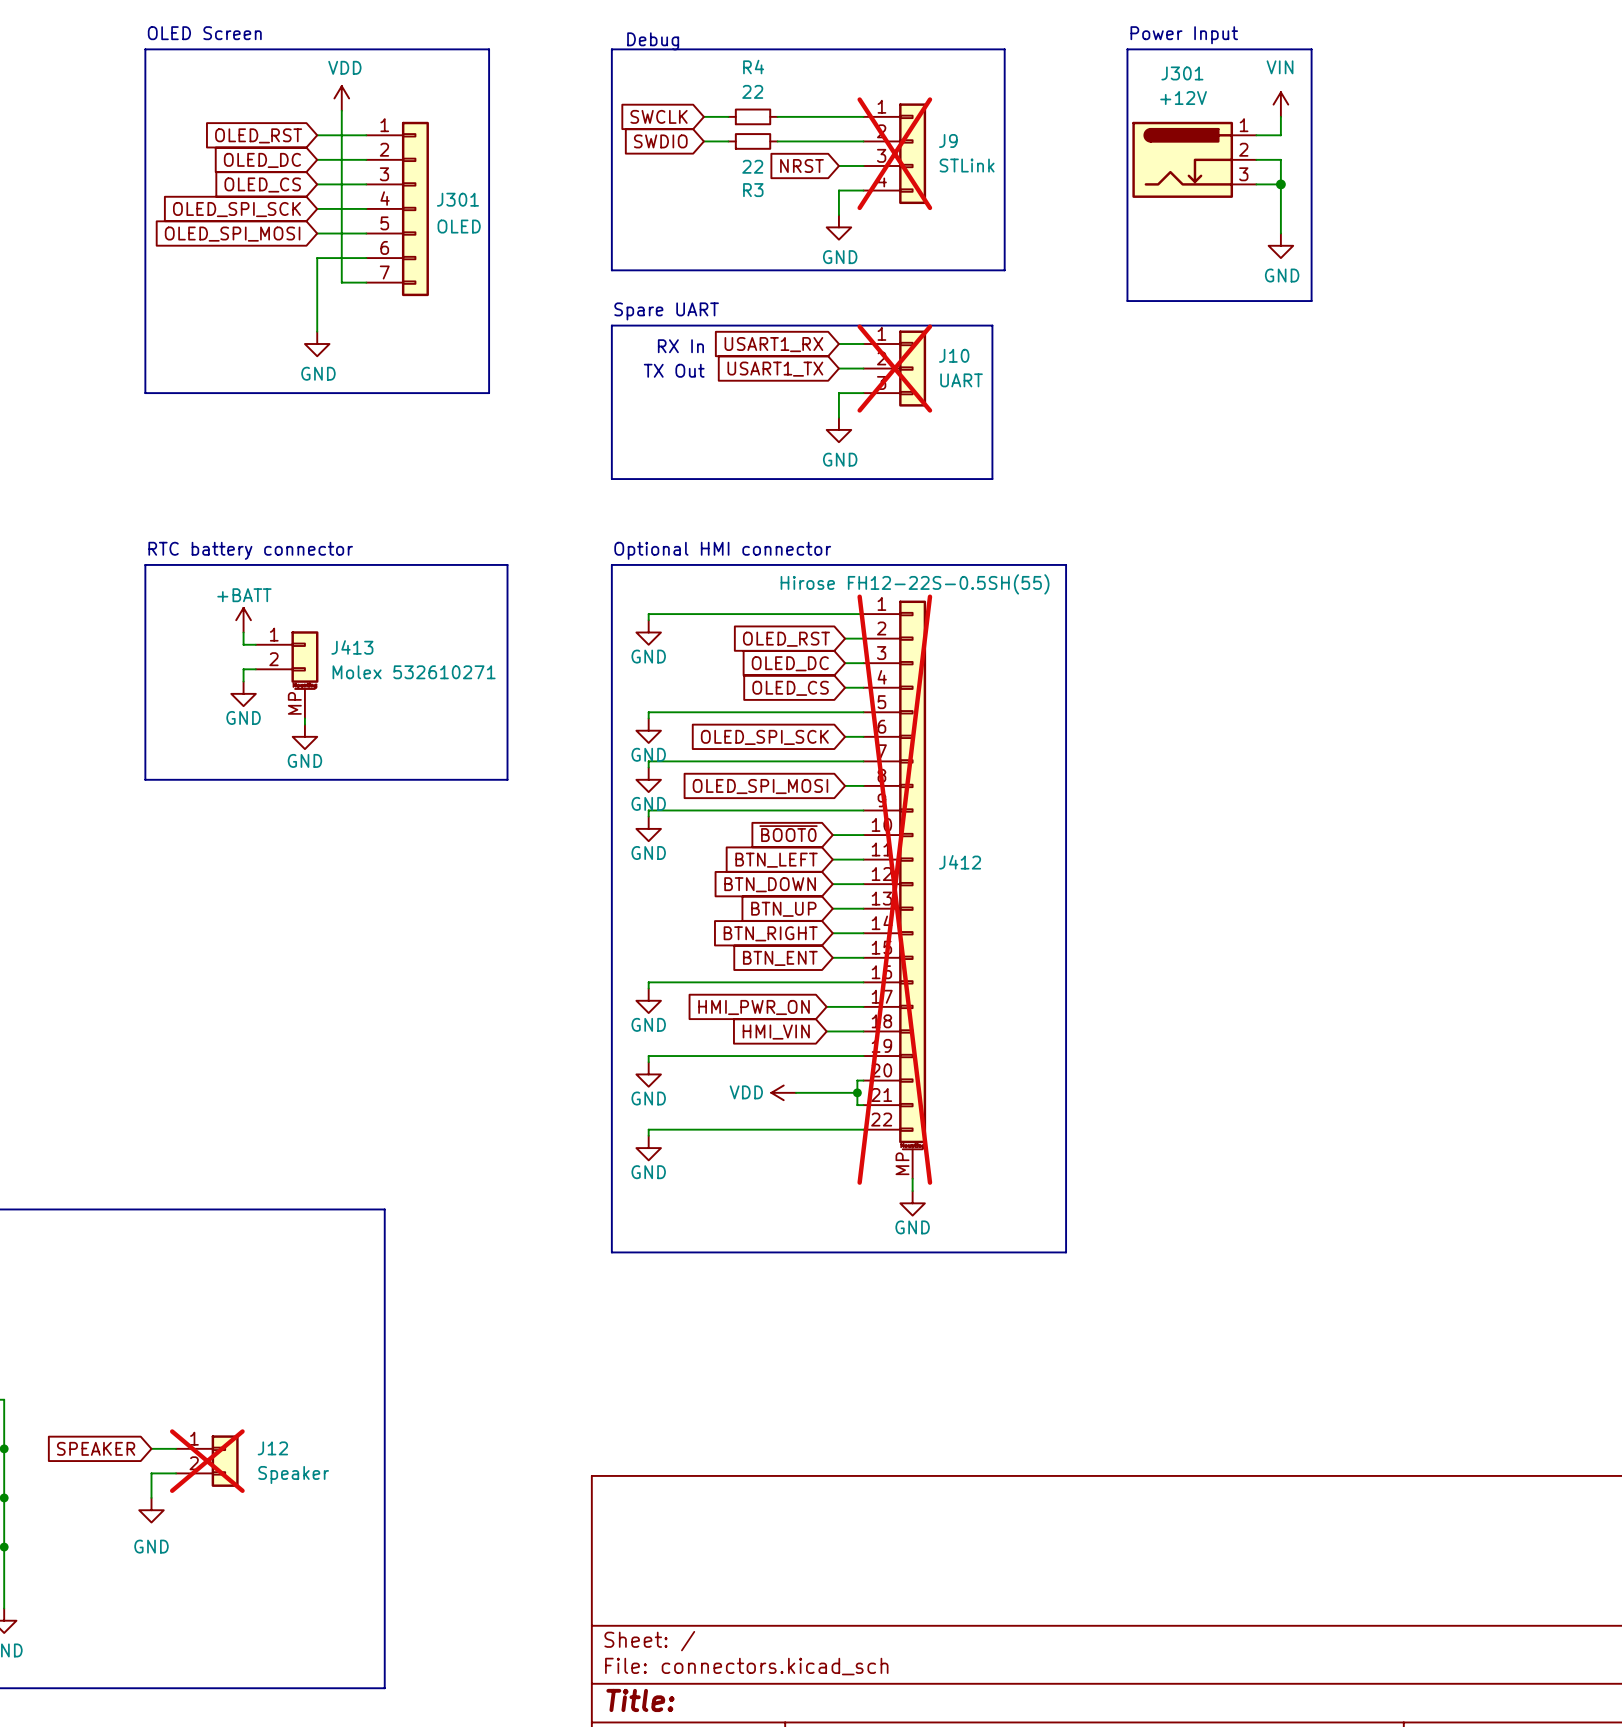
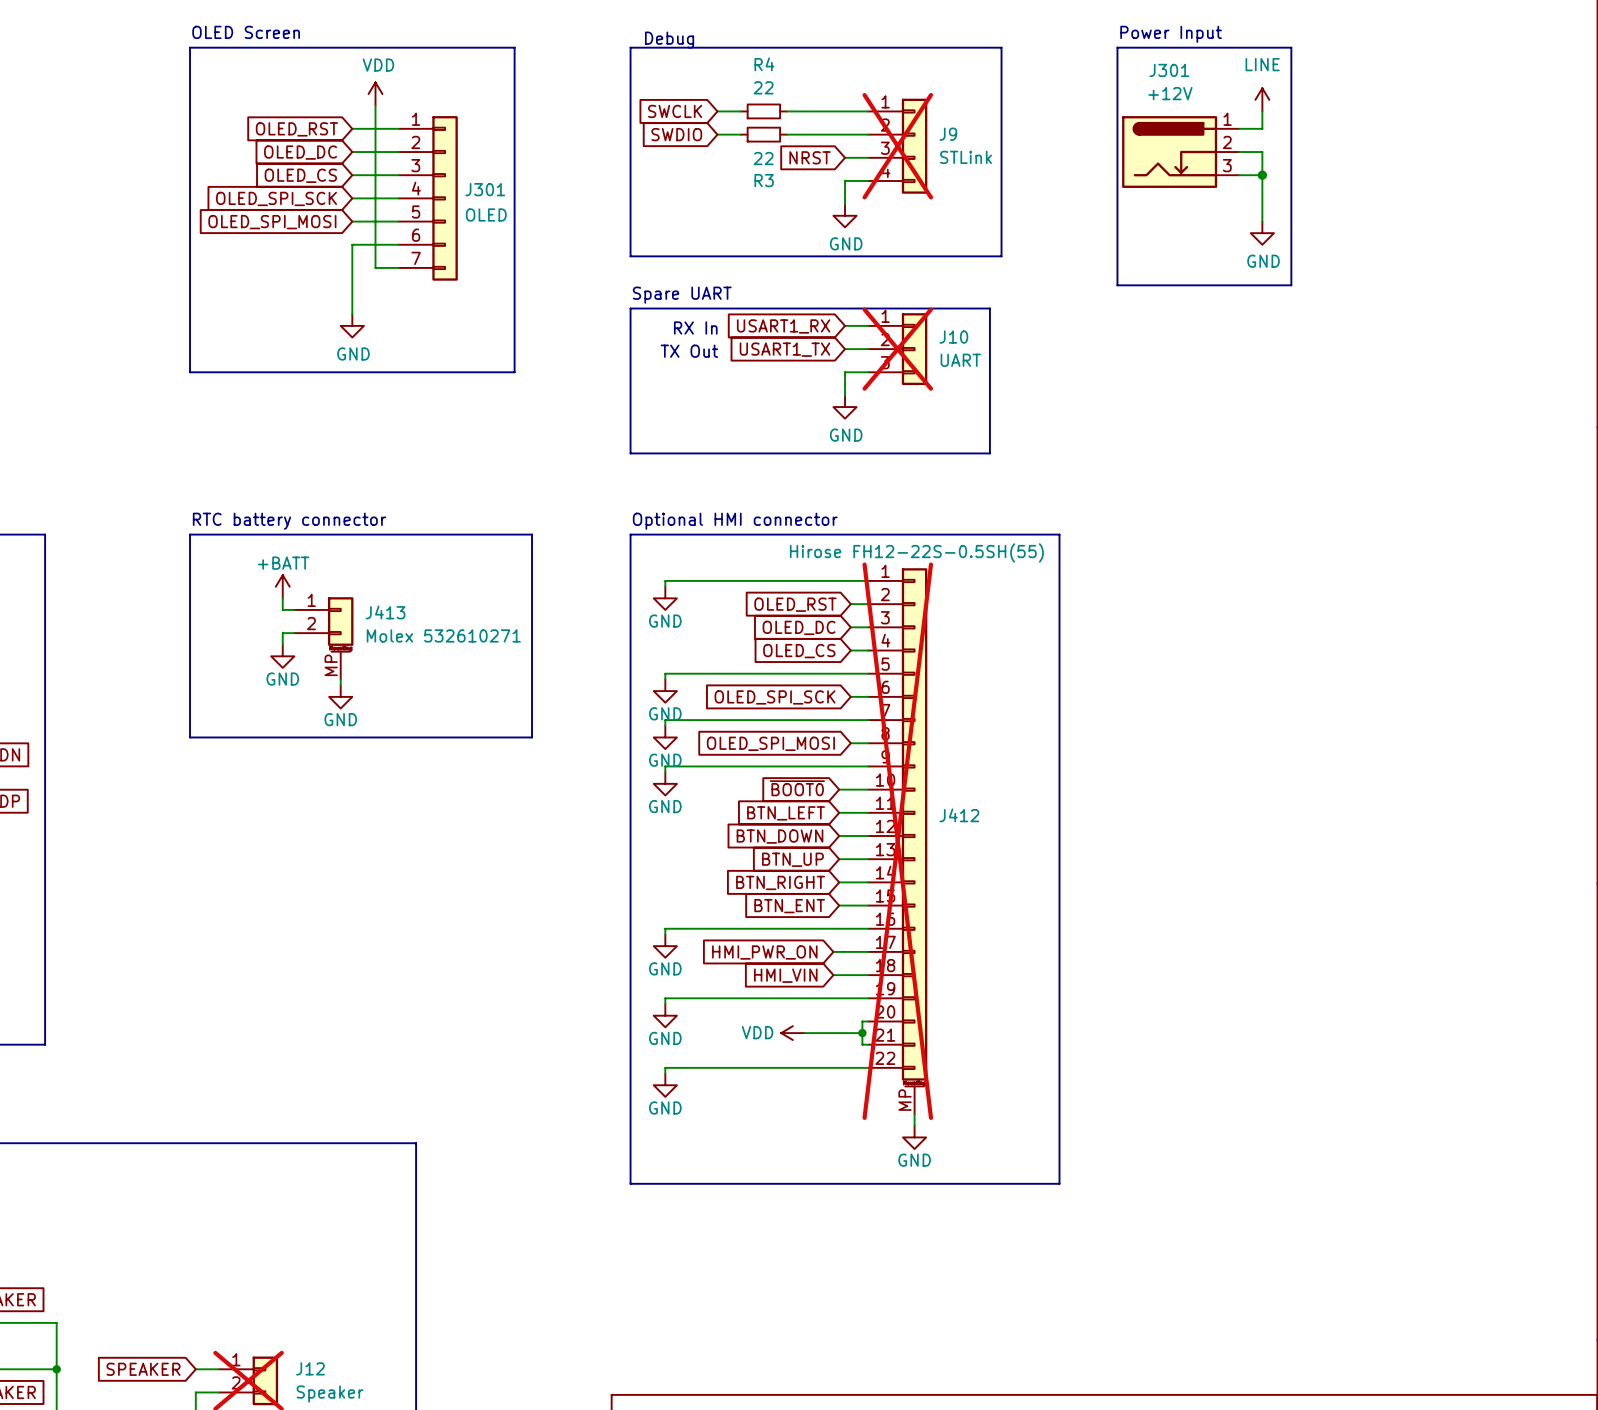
power symbol: VIN (1280, 104) -> LINE (1262, 99)

